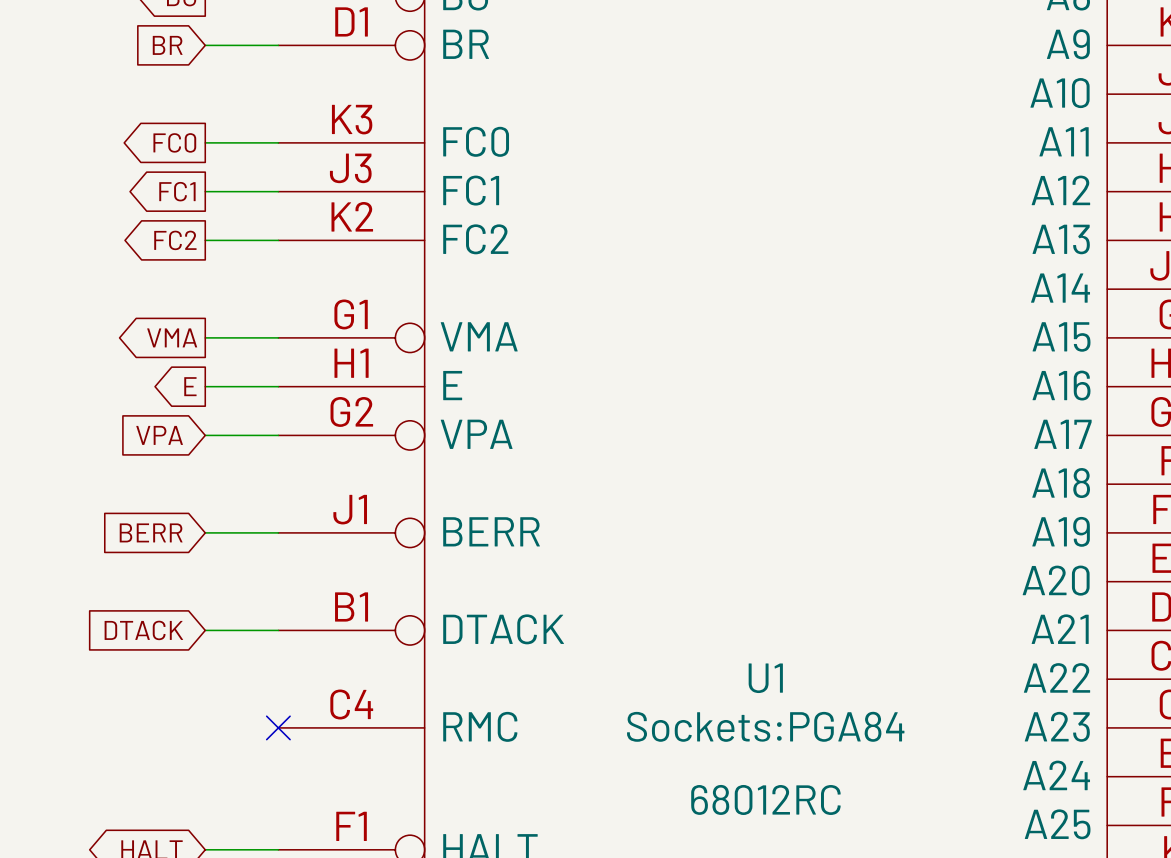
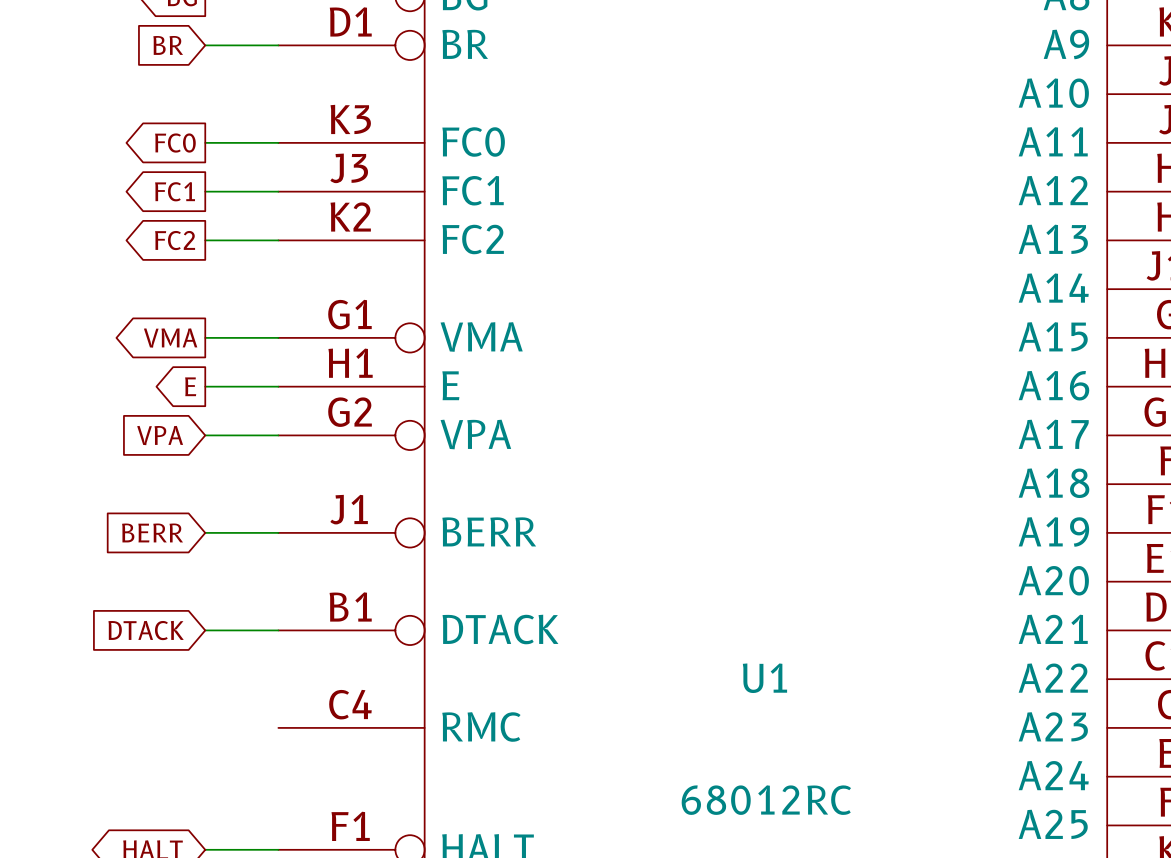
U1 text: Sockets:PGA84 (765, 726) -> none
no-connect mark: (278, 727) -> none

